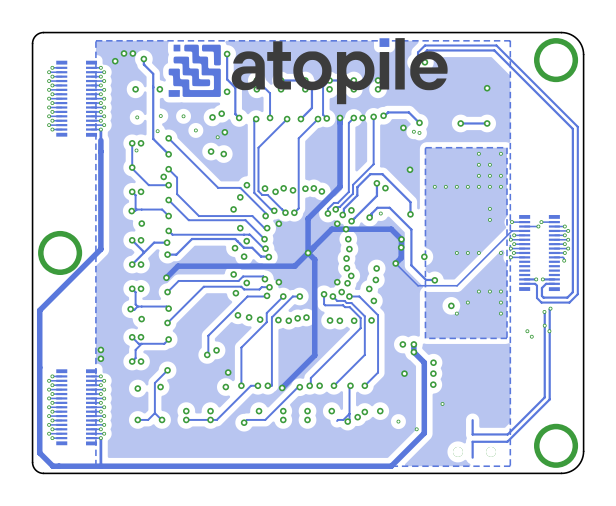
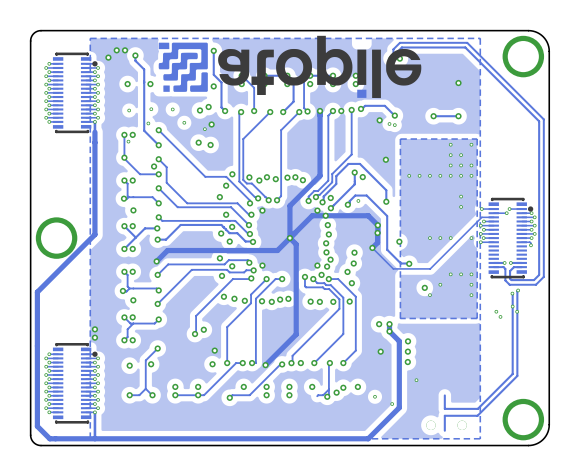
drawing shape: [168, 38, 448, 105] -> [158, 35, 422, 99]
part footprint: [56, 60, 98, 137] -> [52, 52, 98, 134]
part footprint: [519, 215, 560, 292] -> [488, 197, 534, 279]
part footprint: [56, 369, 98, 446] -> [52, 343, 98, 424]

